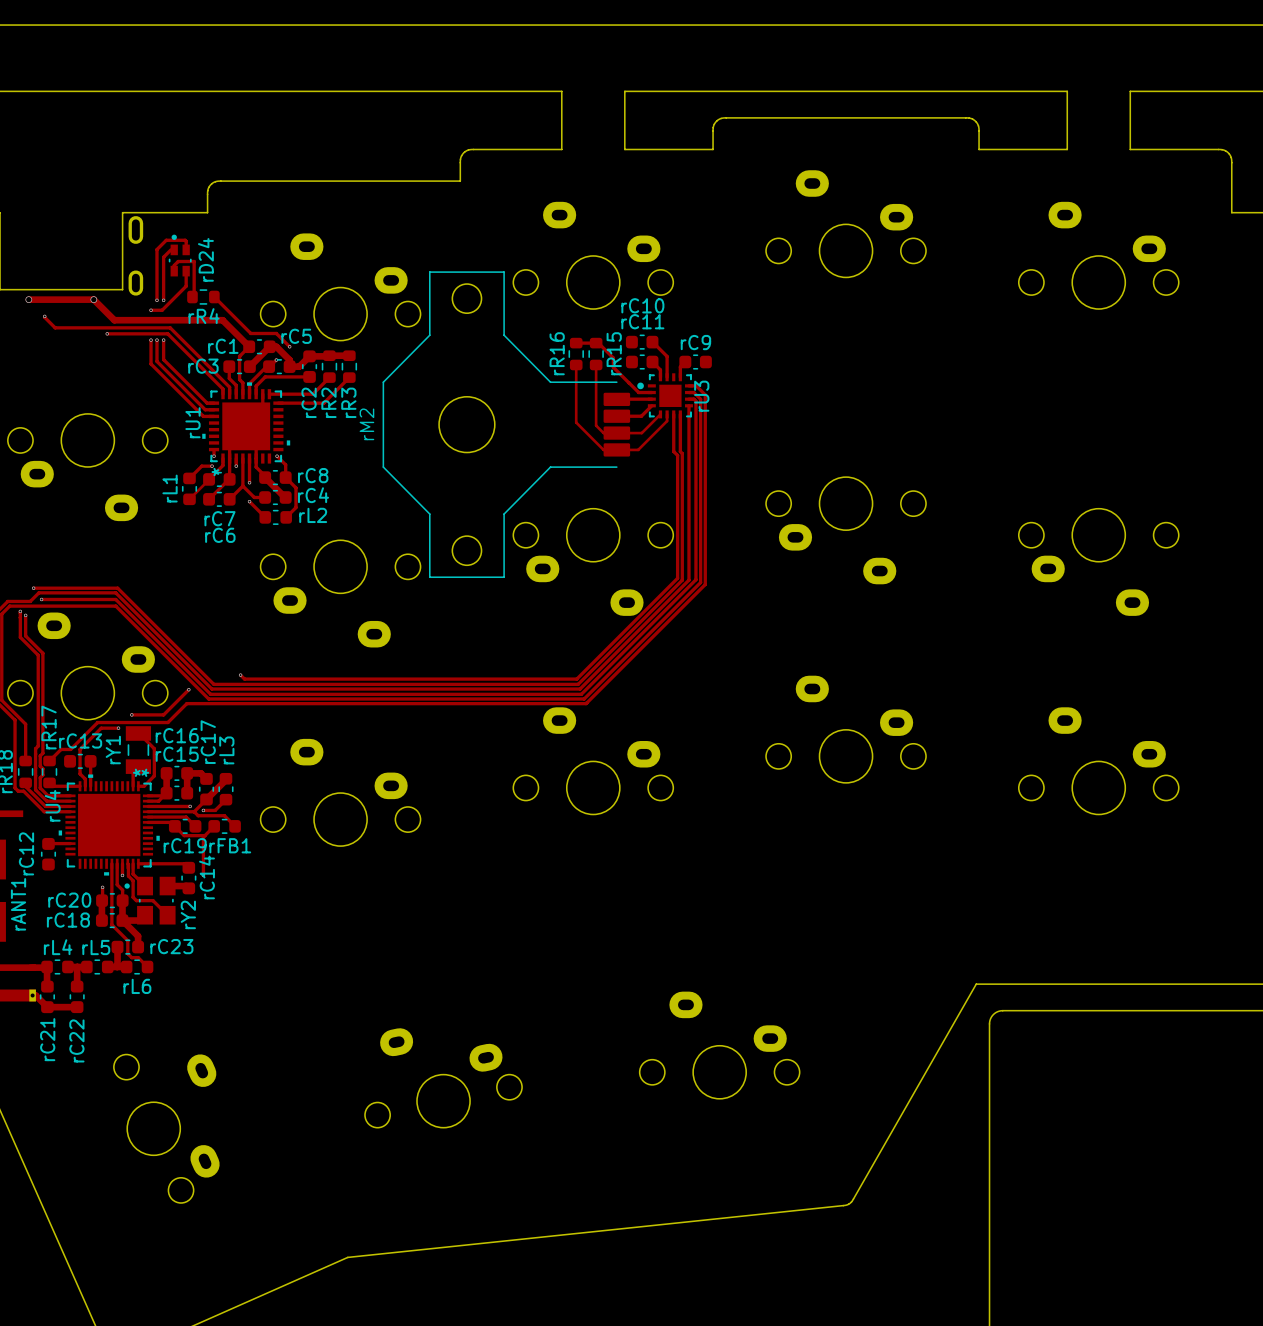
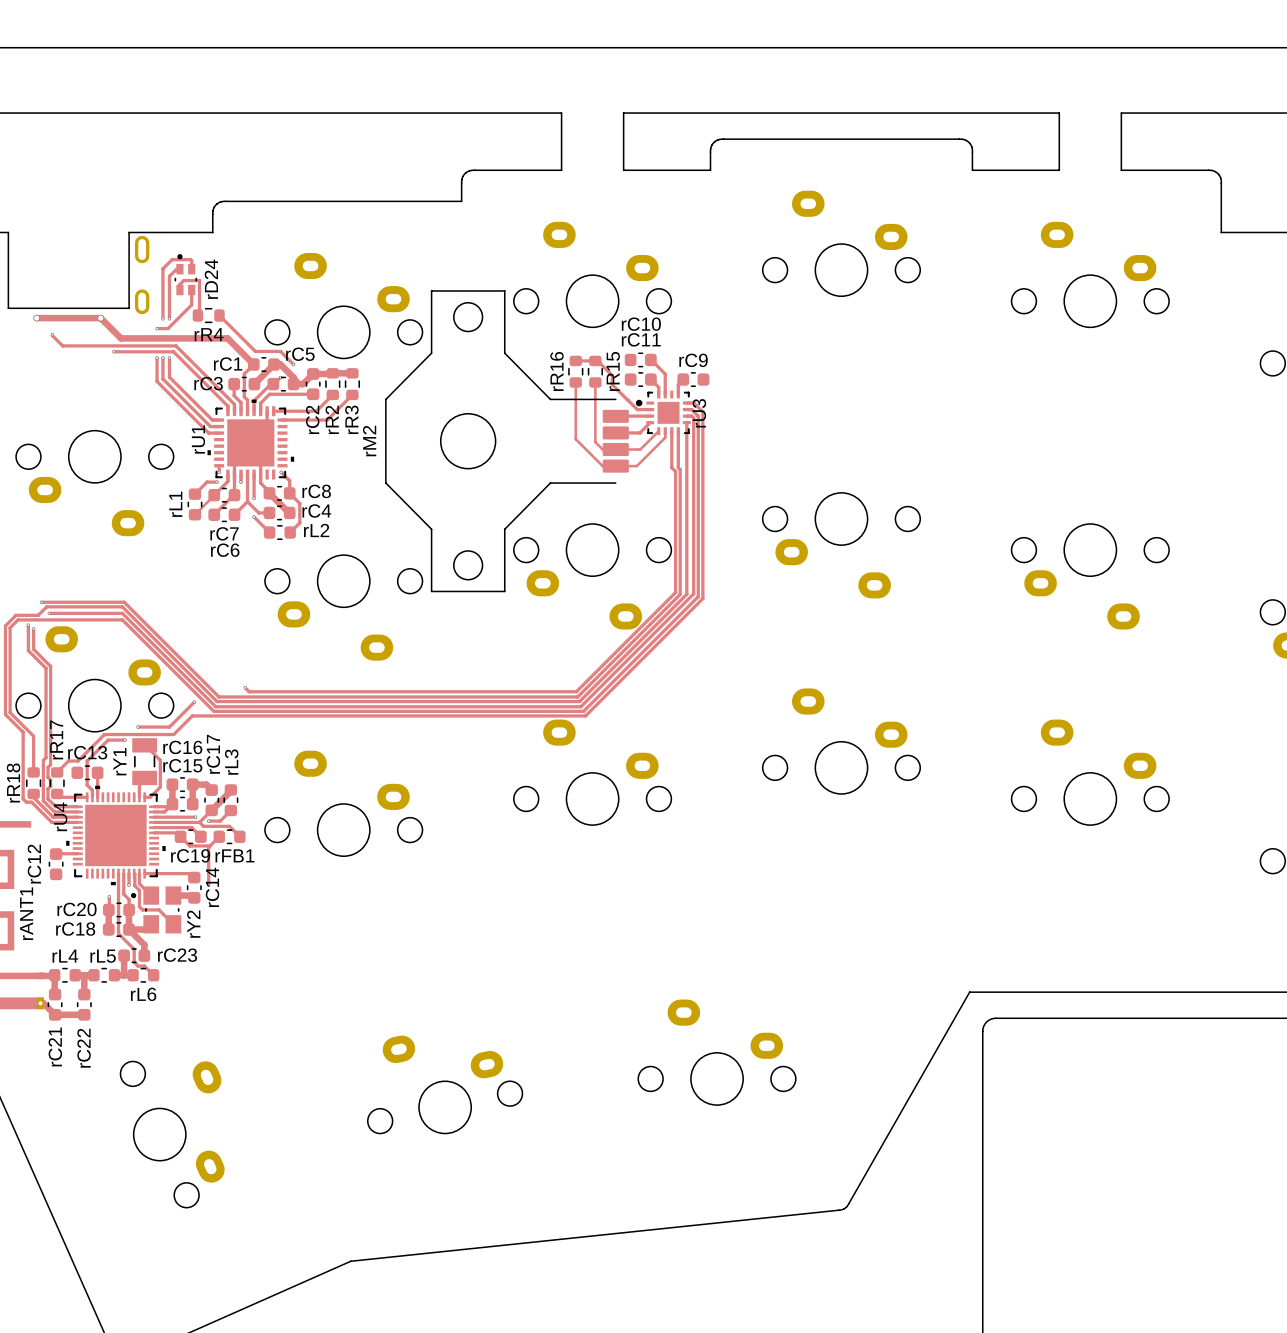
rU1 text: * (215, 472) -> none
rU4 footprint: [58, 774, 160, 876] -> [66, 785, 166, 886]

